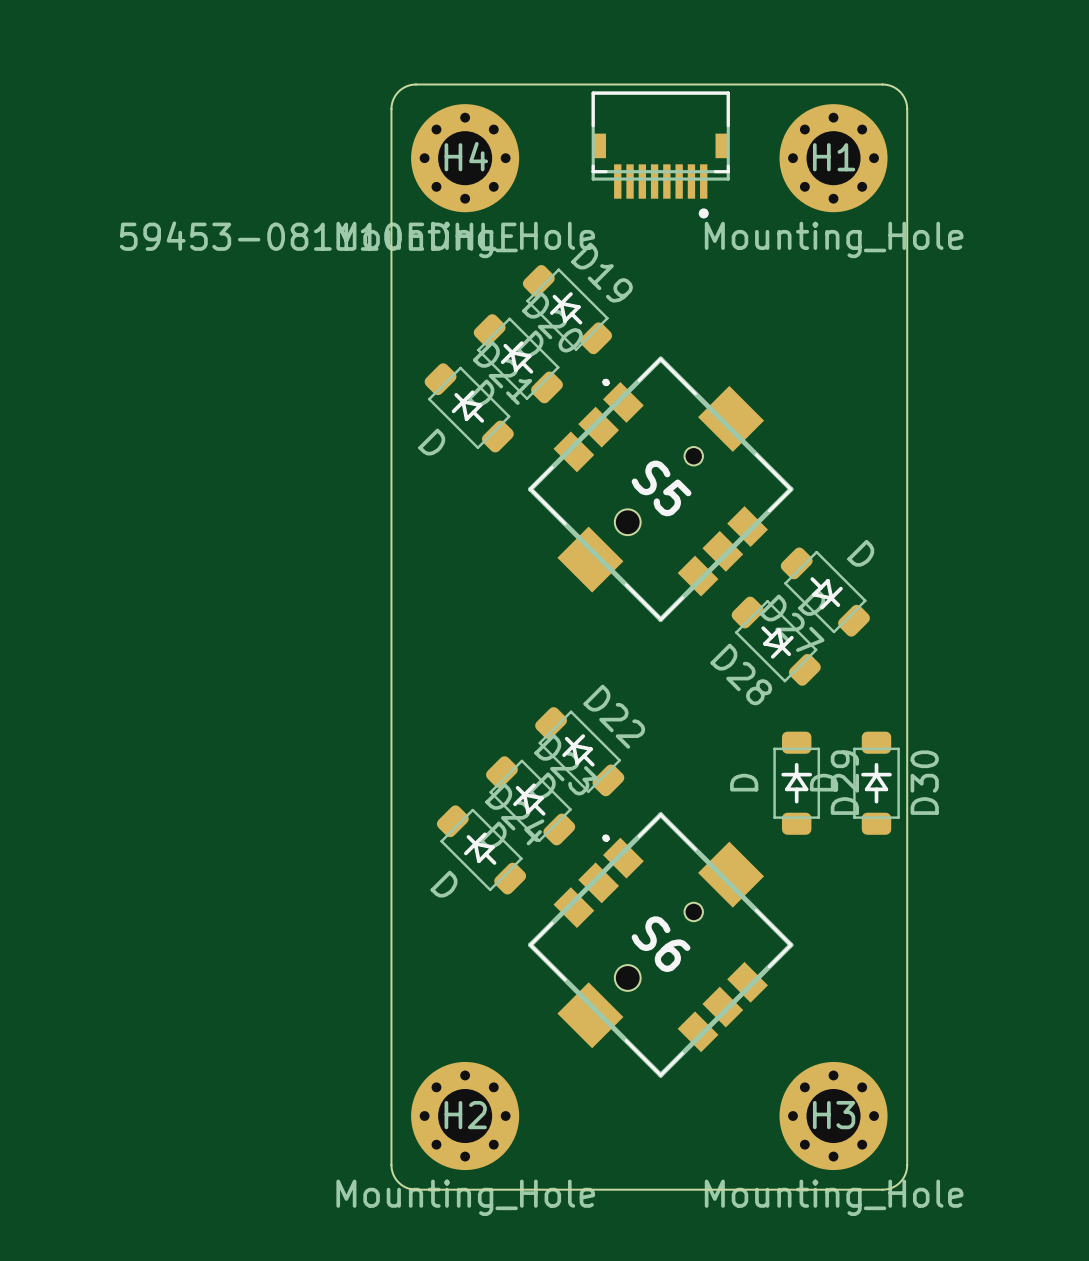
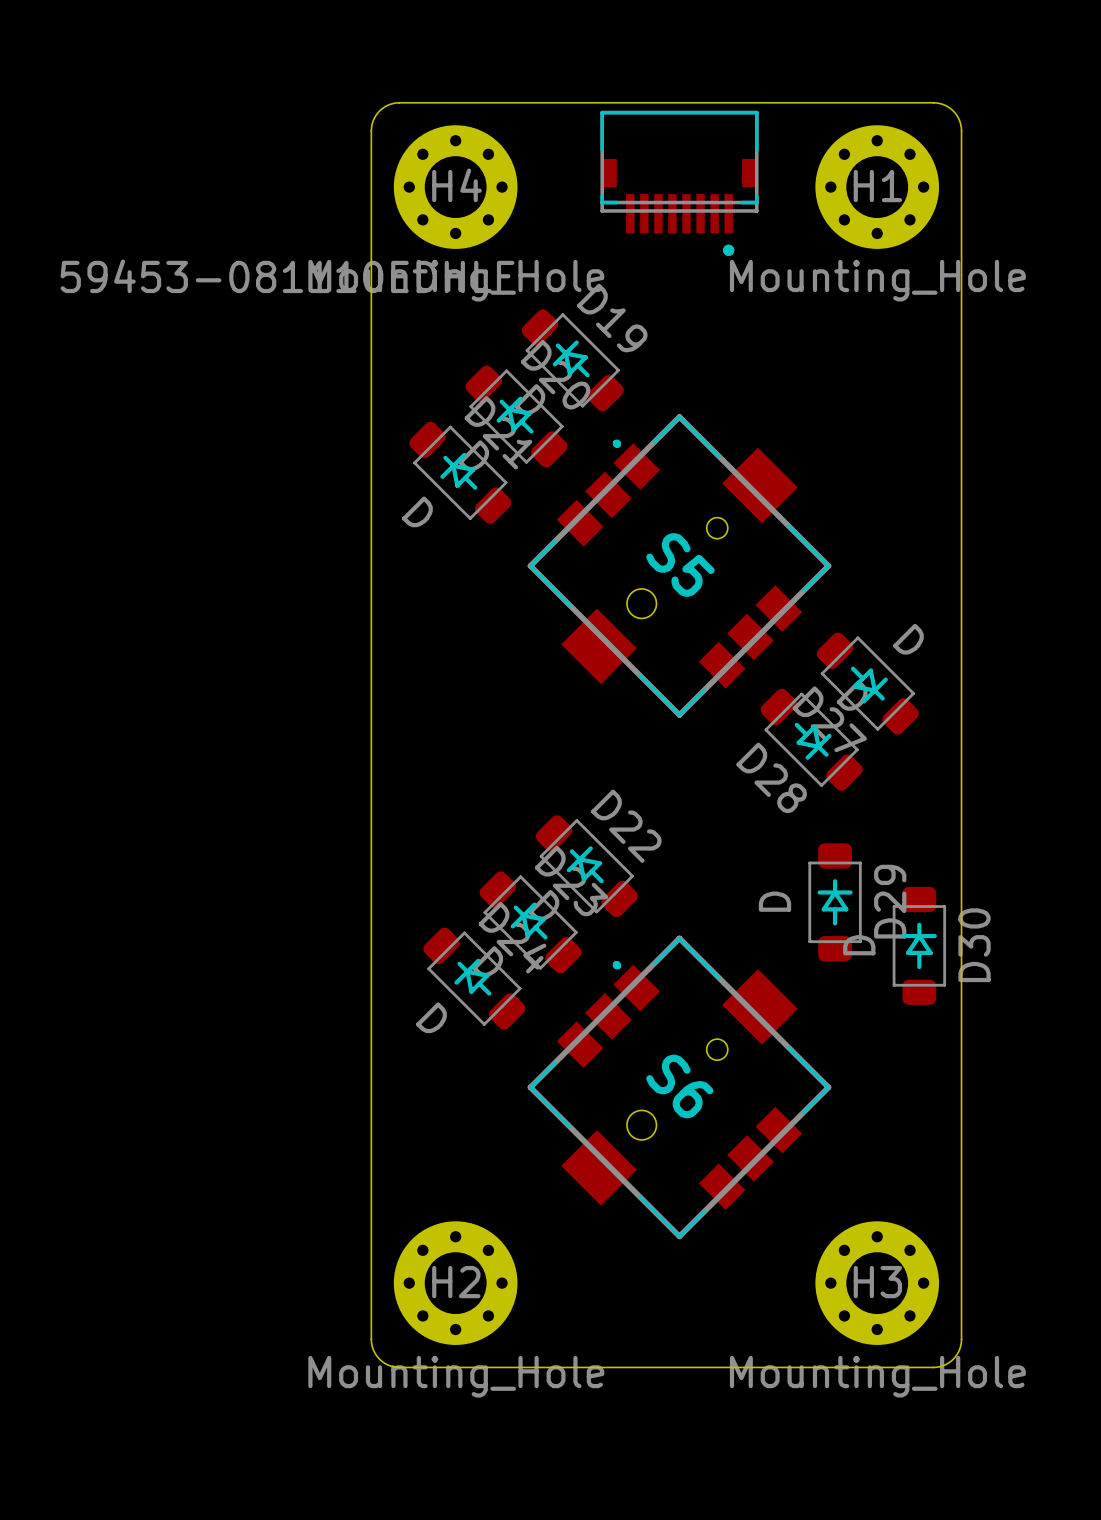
D30 position: (876, 783) -> (919, 945)

